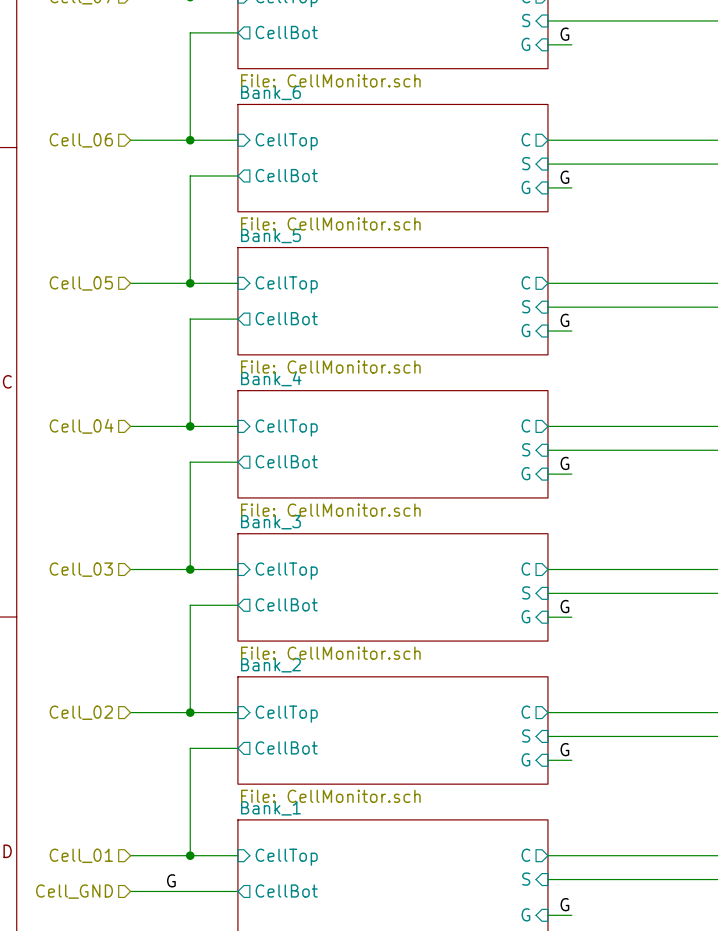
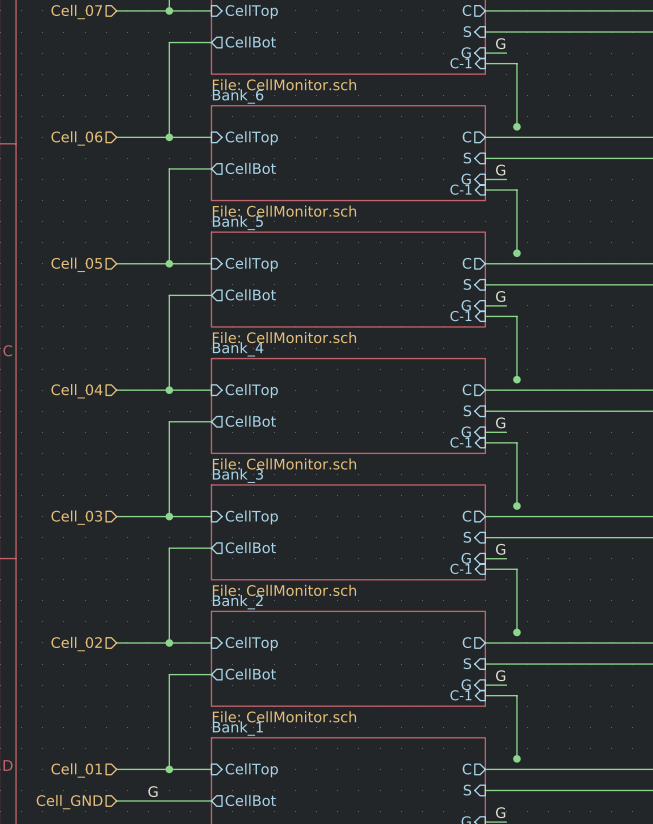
sheet pin: none -> C-1 (460, 63)
wire: none -> (485, 63) (516, 63) (516, 126)
junction: none -> (516, 126)
sheet pin: none -> C-1 (460, 189)
wire: none -> (485, 190) (516, 190) (516, 253)
junction: none -> (516, 253)
sheet pin: none -> C-1 (460, 316)
wire: none -> (485, 316) (516, 316) (516, 379)
junction: none -> (516, 379)
sheet pin: none -> C-1 (460, 442)
wire: none -> (485, 442) (516, 442) (516, 506)
junction: none -> (516, 506)
sheet pin: none -> C-1 (460, 568)
wire: none -> (485, 569) (516, 569) (516, 632)
junction: none -> (516, 632)
sheet pin: none -> C-1 (460, 695)
wire: none -> (485, 695) (516, 695) (516, 758)
junction: none -> (516, 758)

